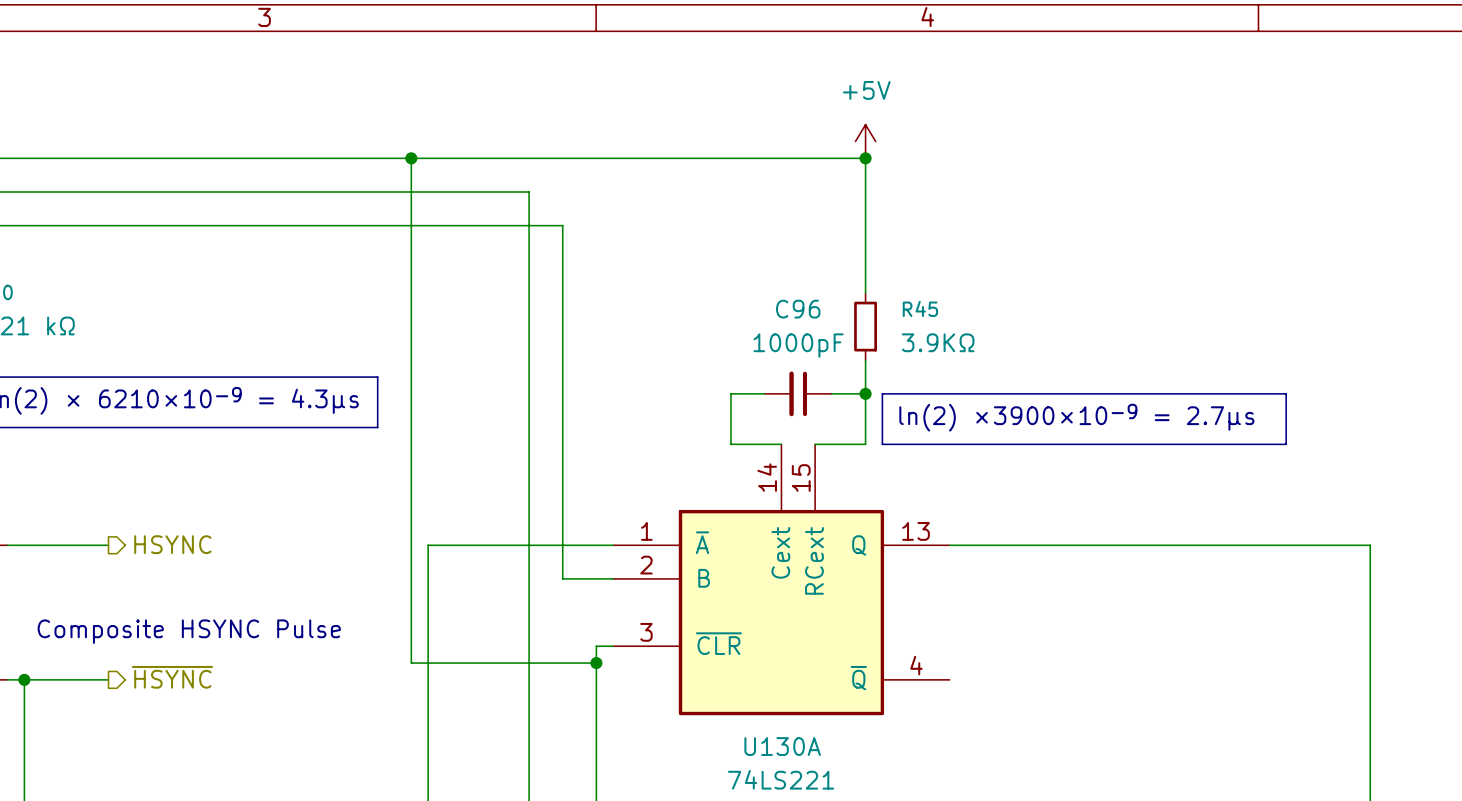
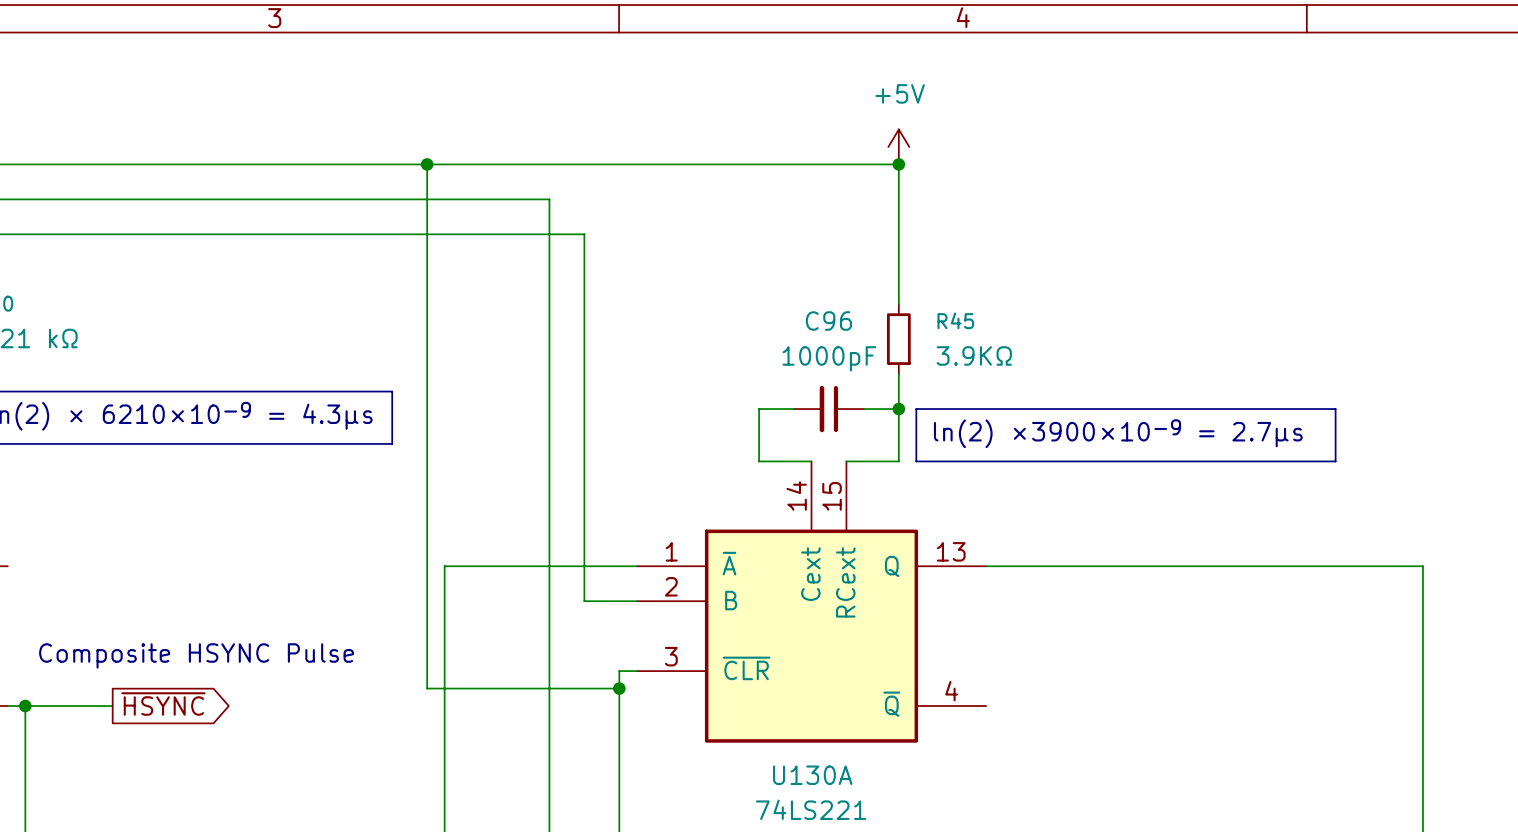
hierarchical label: HSYNC (172, 544) -> none
wire: (7, 545) (108, 545) -> none
global label: none -> ~{HSYNC} (163, 704)
hierarchical label: ~{HSYNC} (172, 677) -> none

